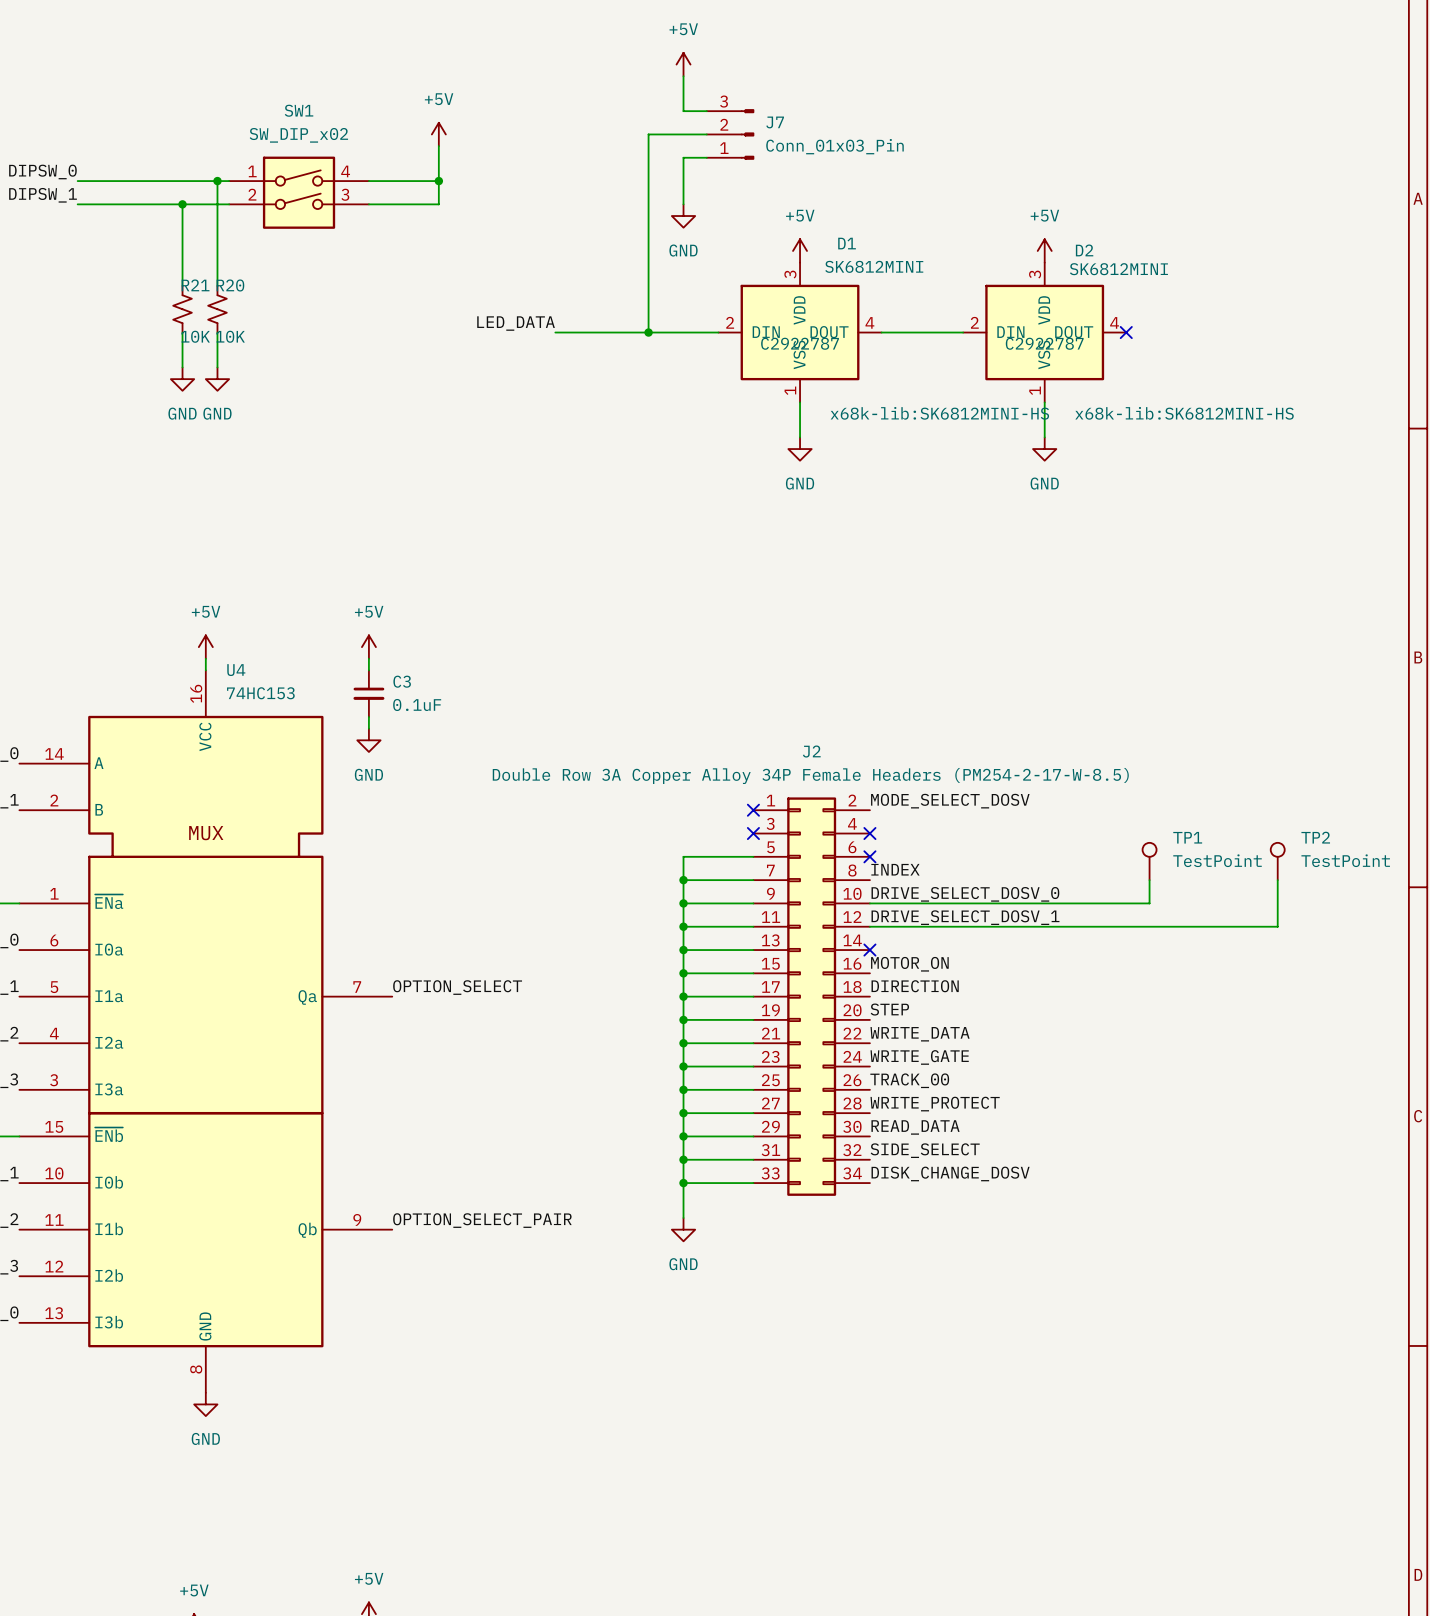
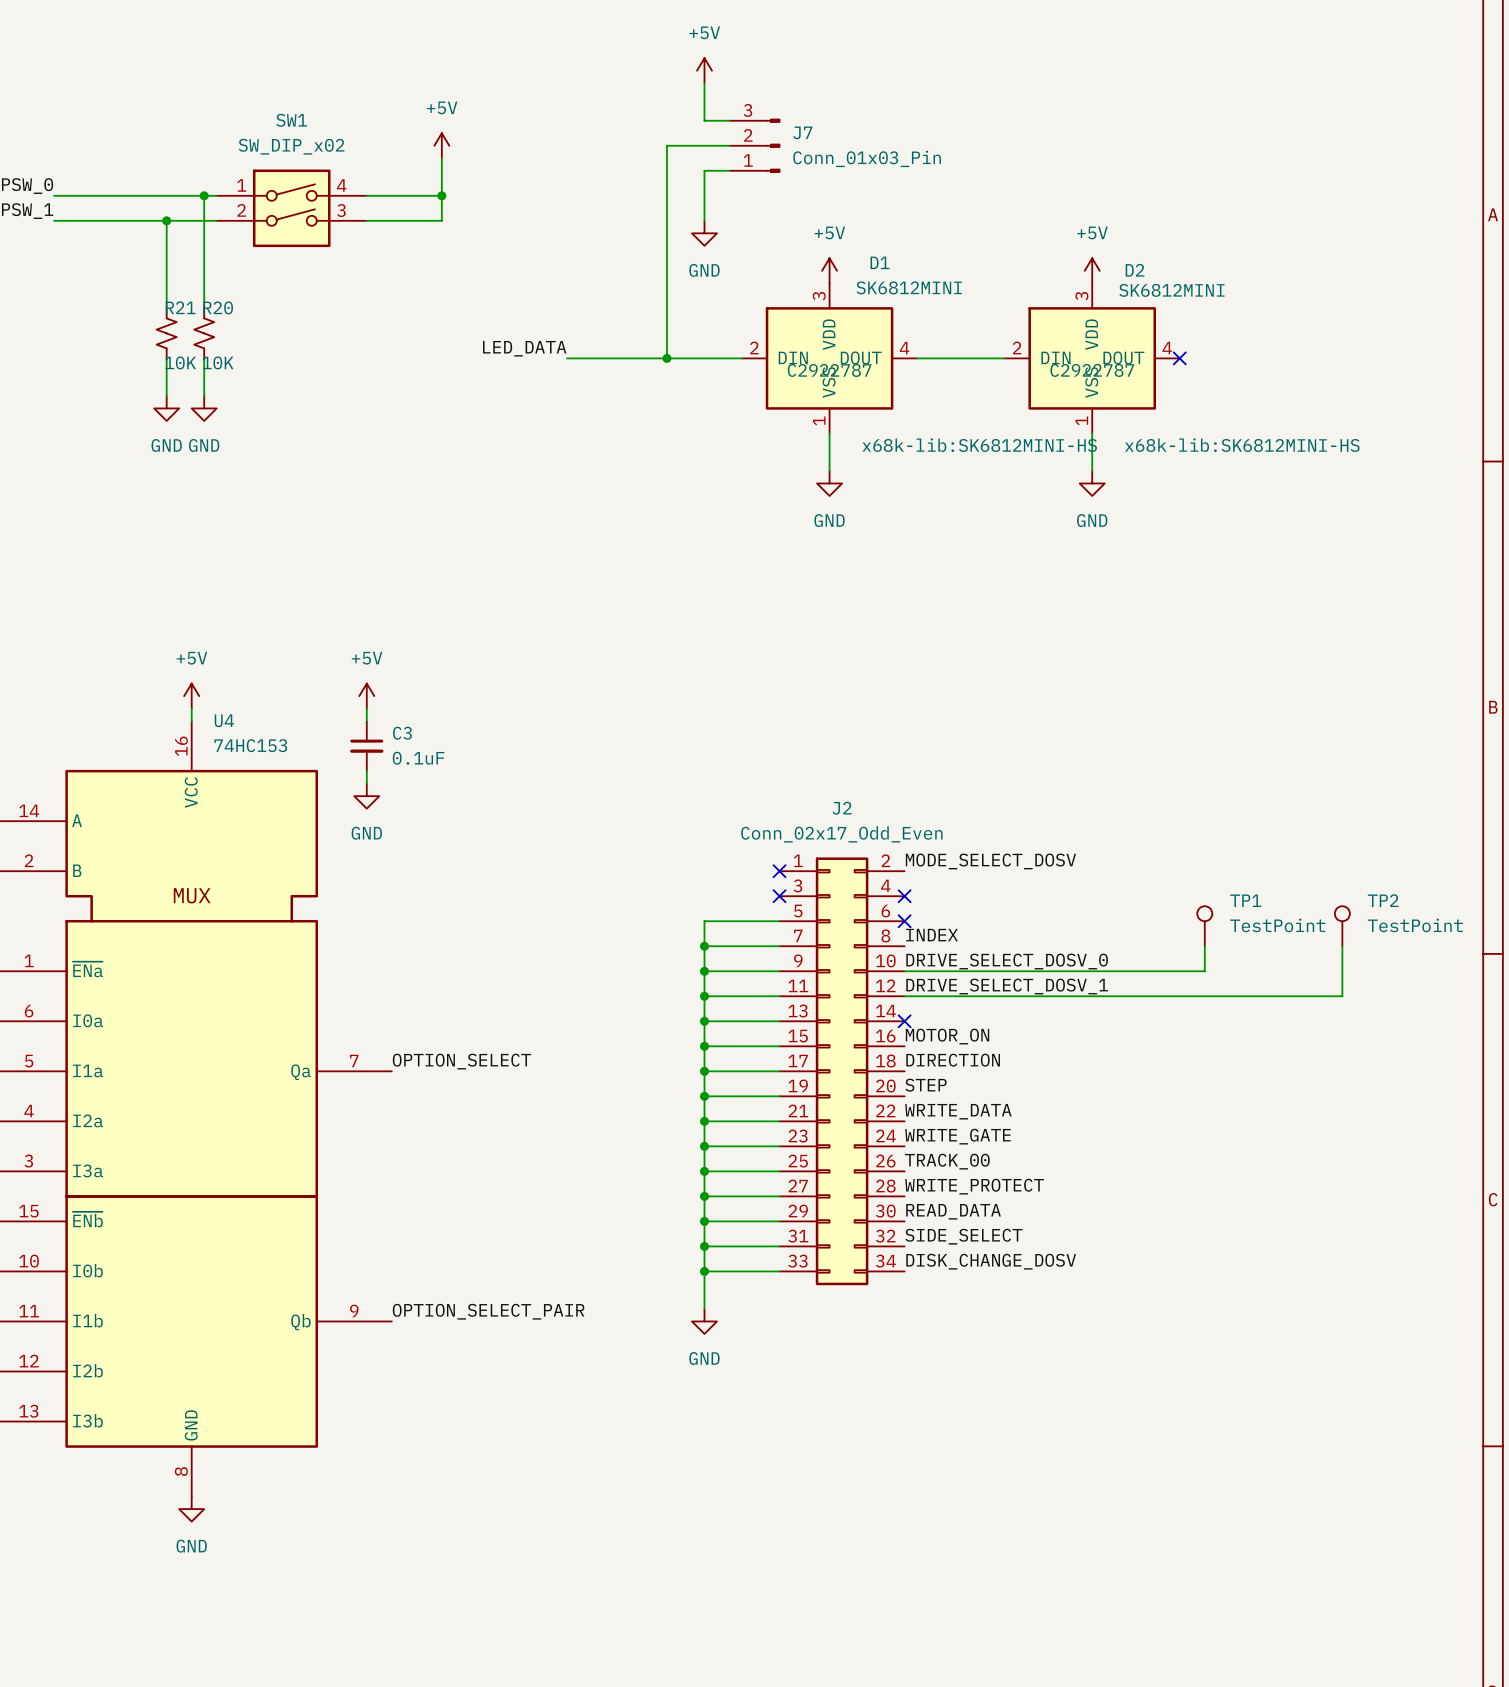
J2 value: Double Row 3A Copper Alloy 34P Female Headers (PM254-2-17-W-8.5) (810, 775) -> Conn_02x17_Odd_Even (841, 834)

